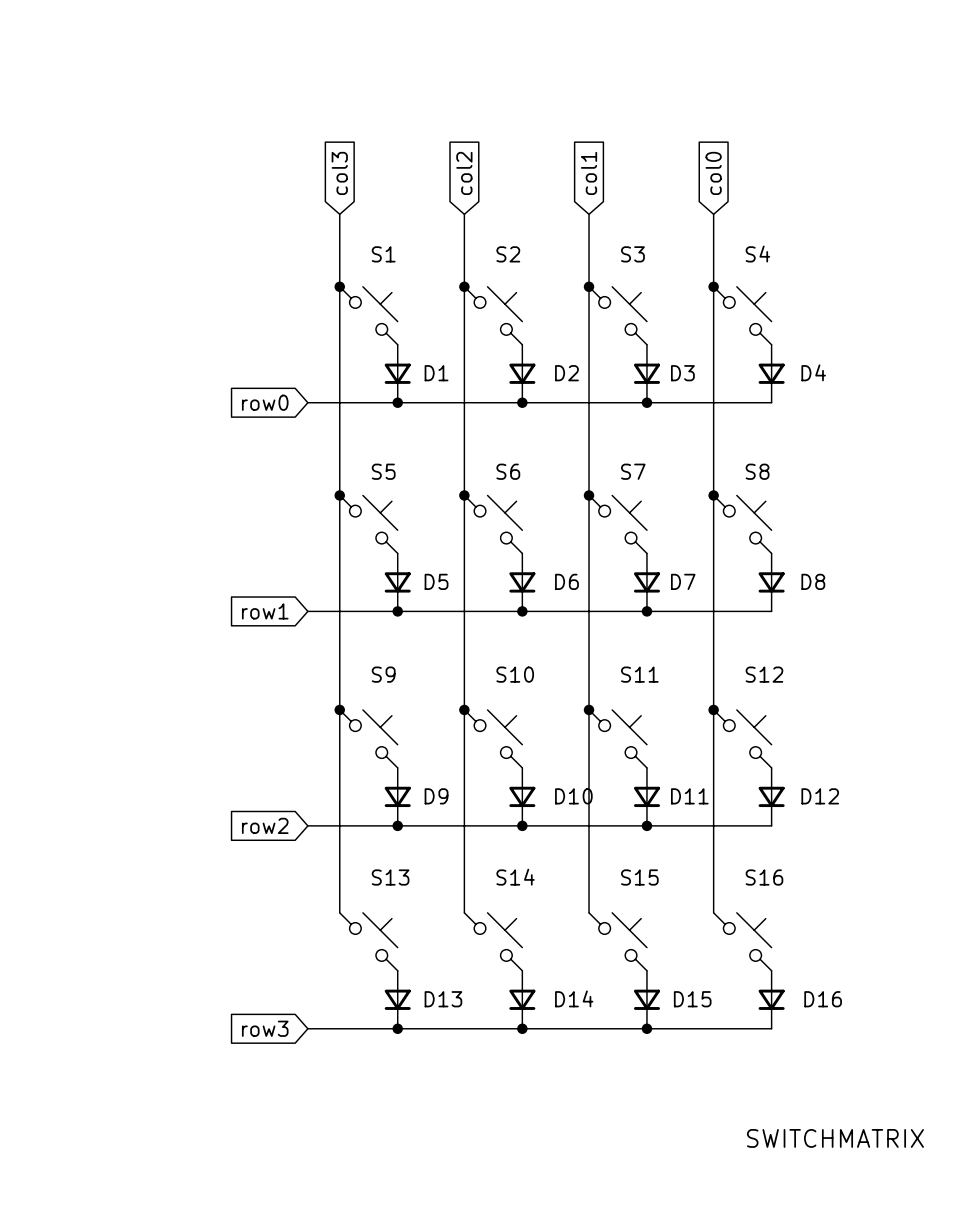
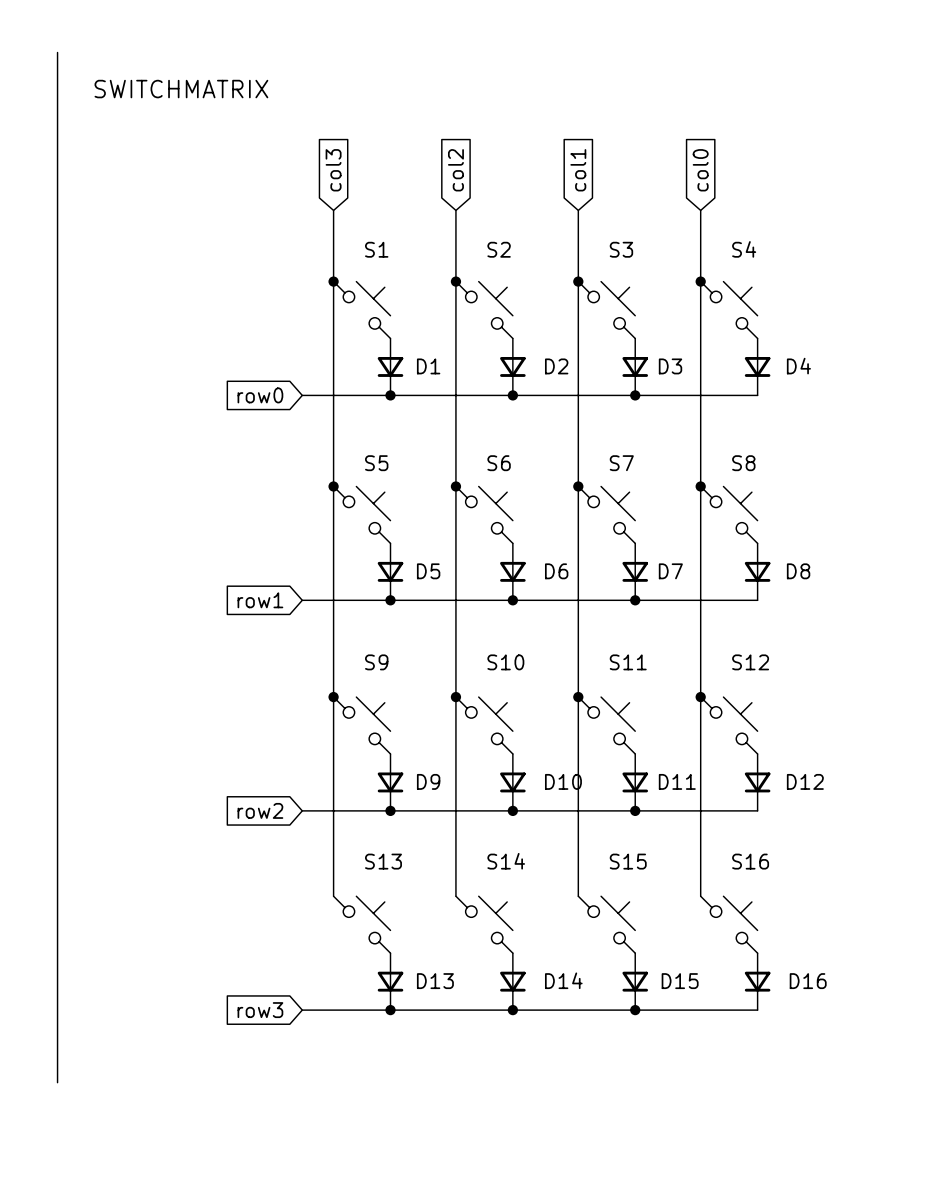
line: none -> (57, 52) (57, 1082)
text: none -> SWITCHMATRIX (181, 89)
text: SWITCHMATRIX (835, 1138) -> none

